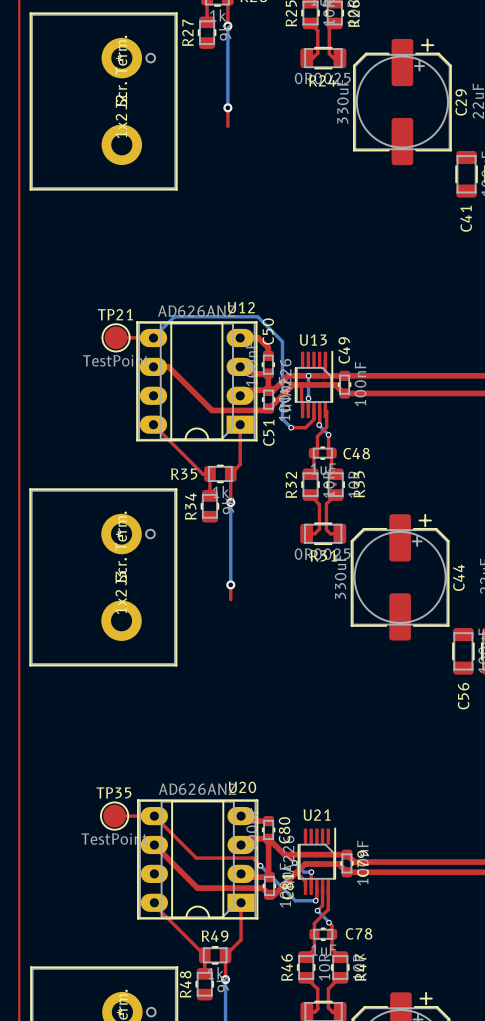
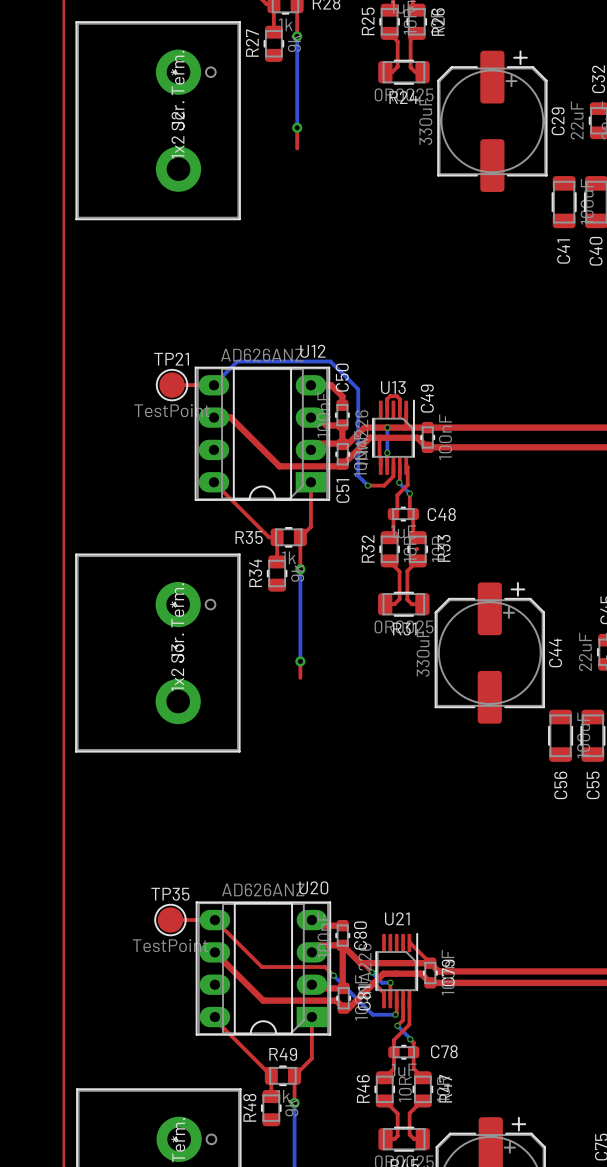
top track: none -> (387, 409) (387, 399) (390, 396) (396, 396) (399, 399) (399, 409)
top track: none -> (409, 943) (430, 963)

